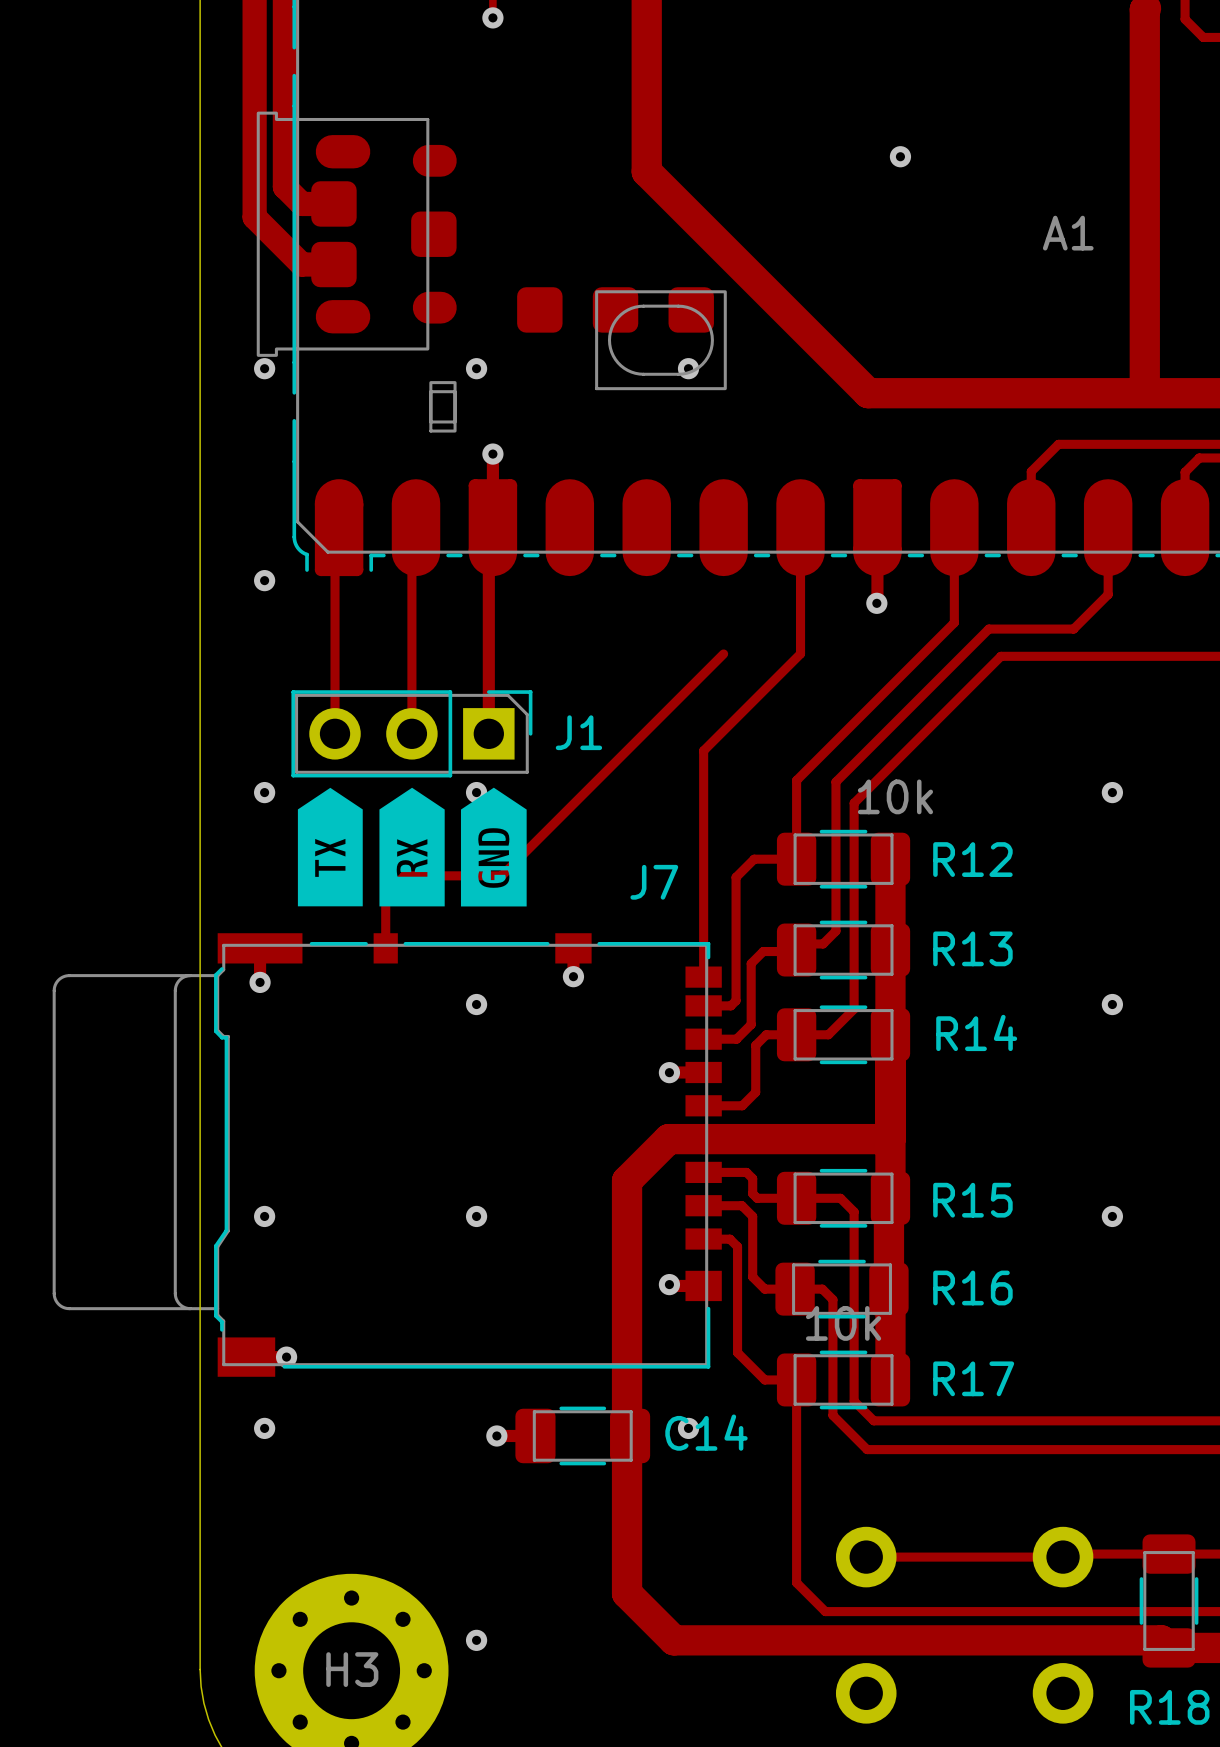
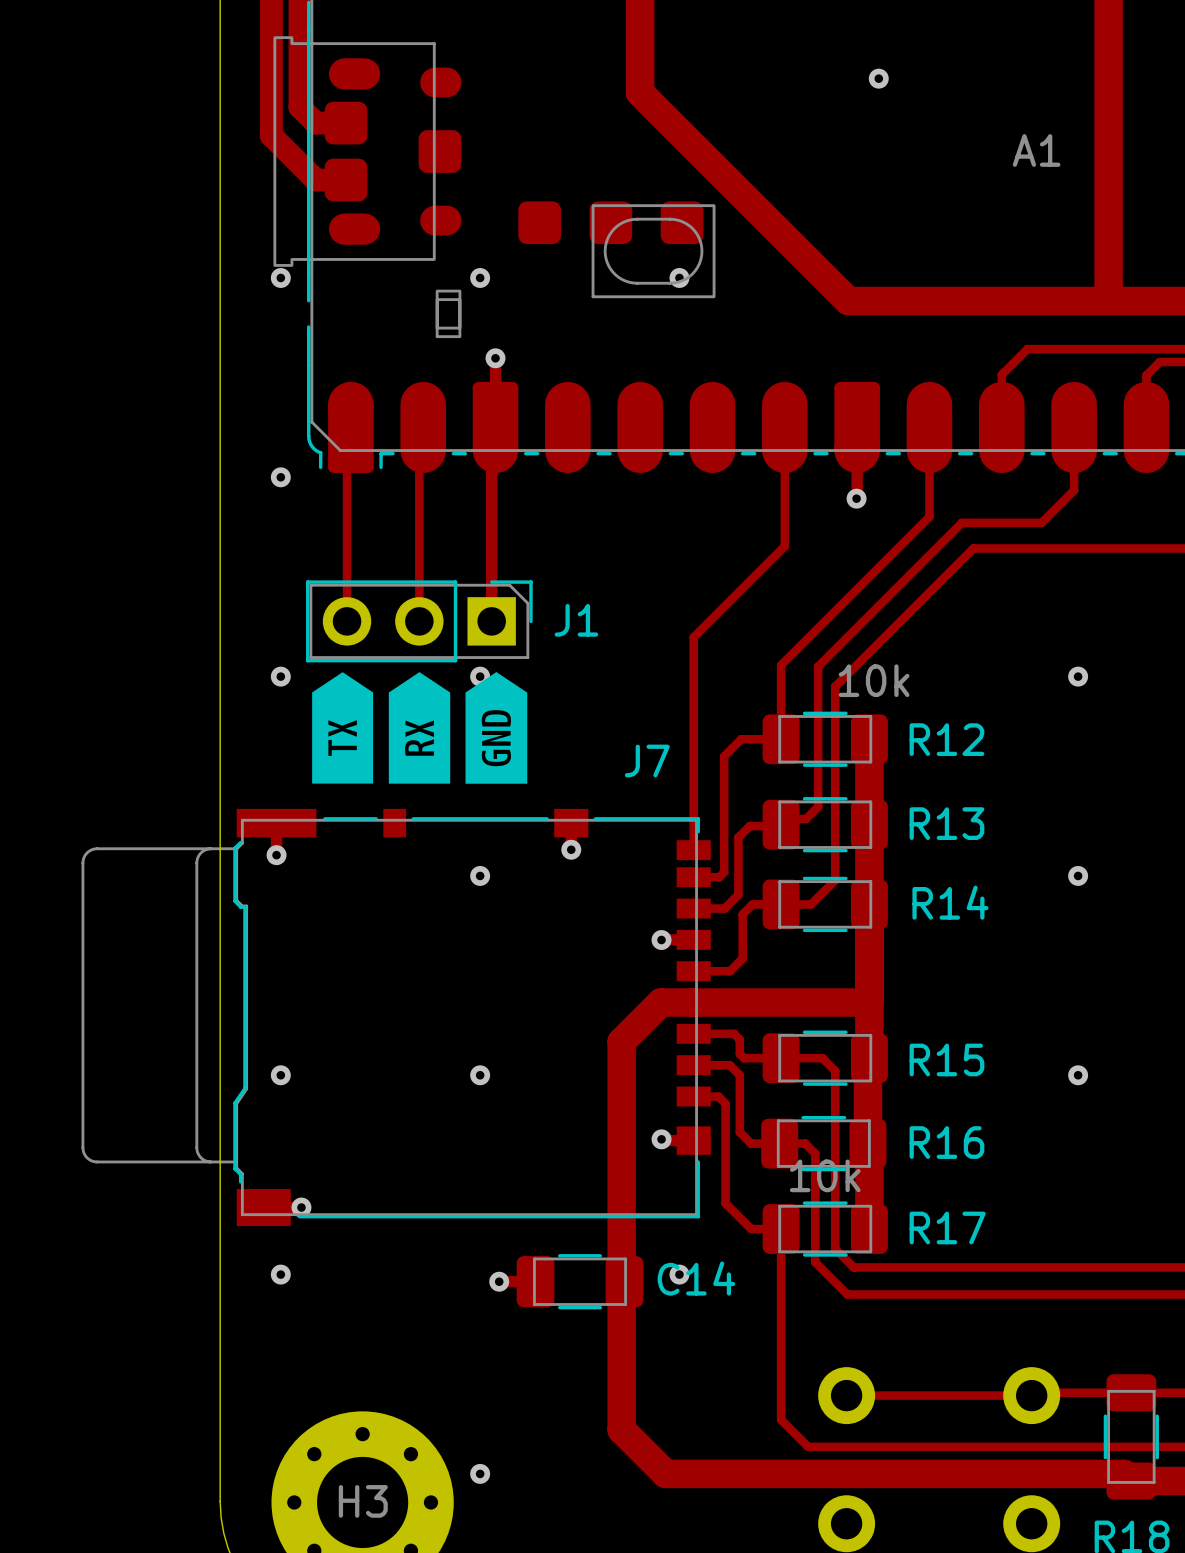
top track: (723, 653) (501, 875) (404, 875) (385, 894) (385, 948) -> none

